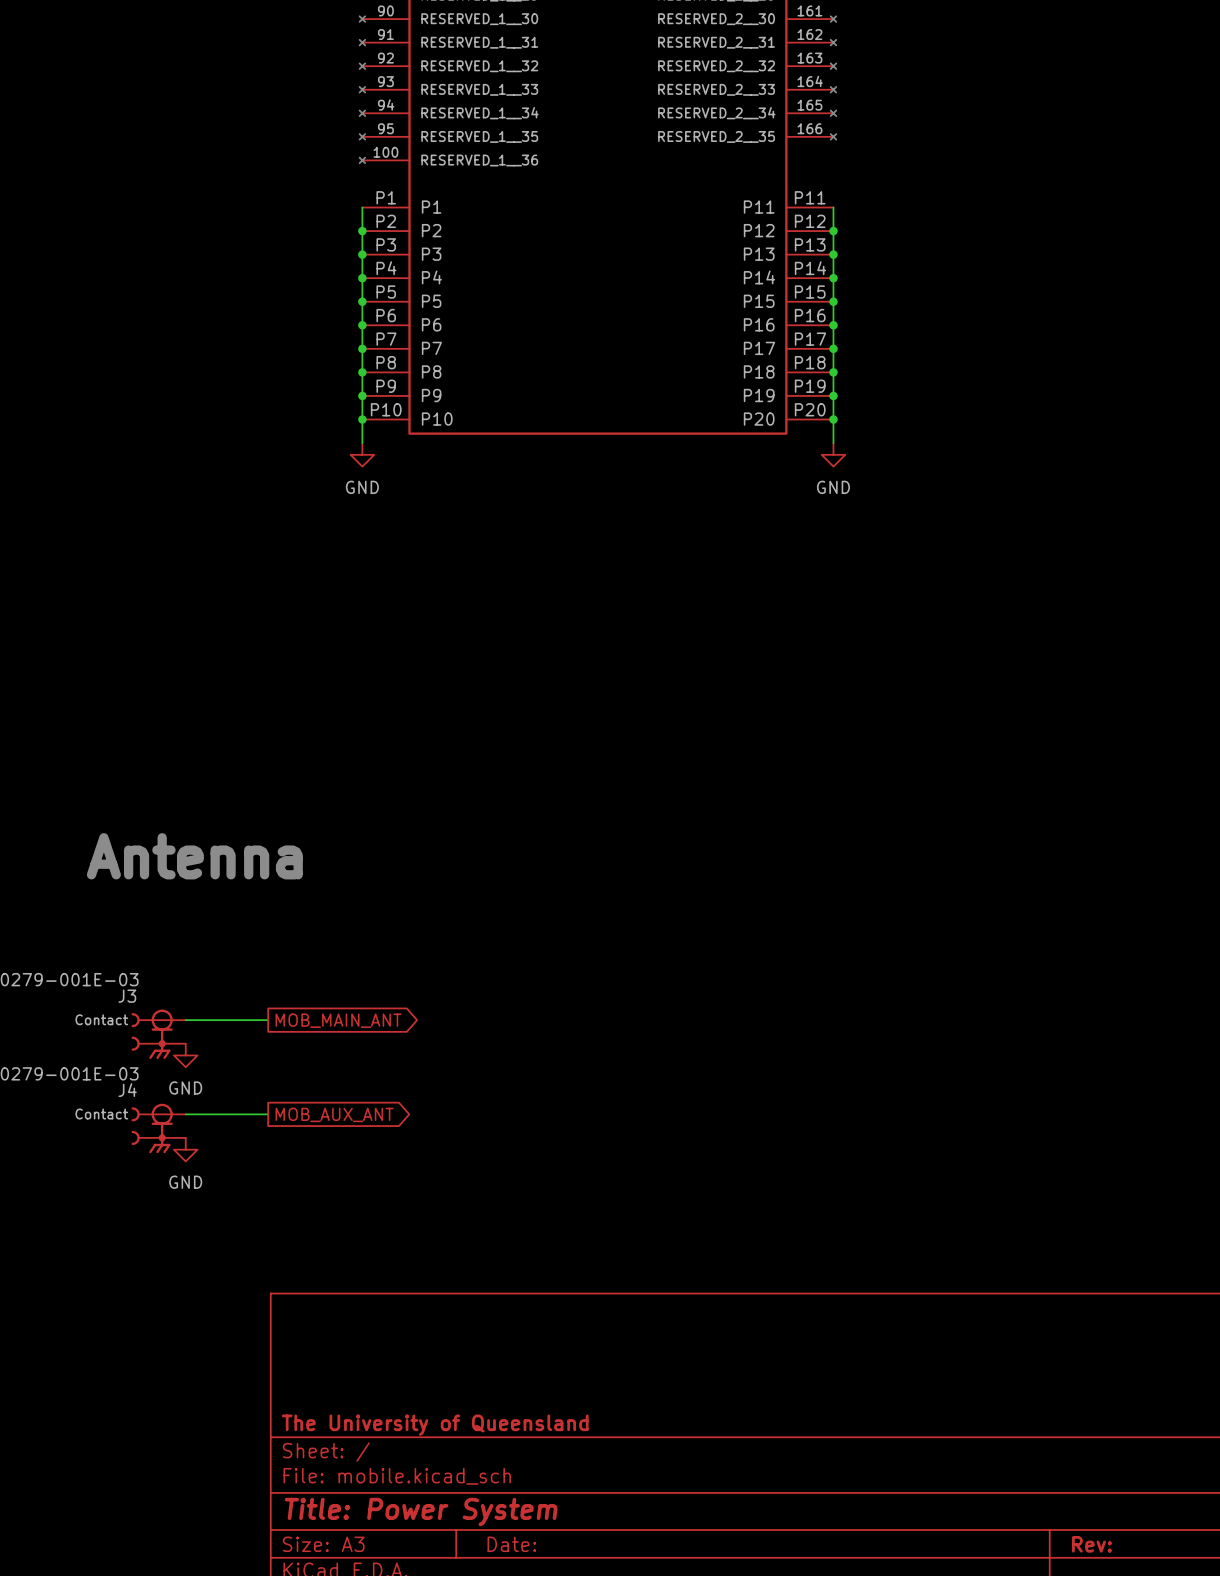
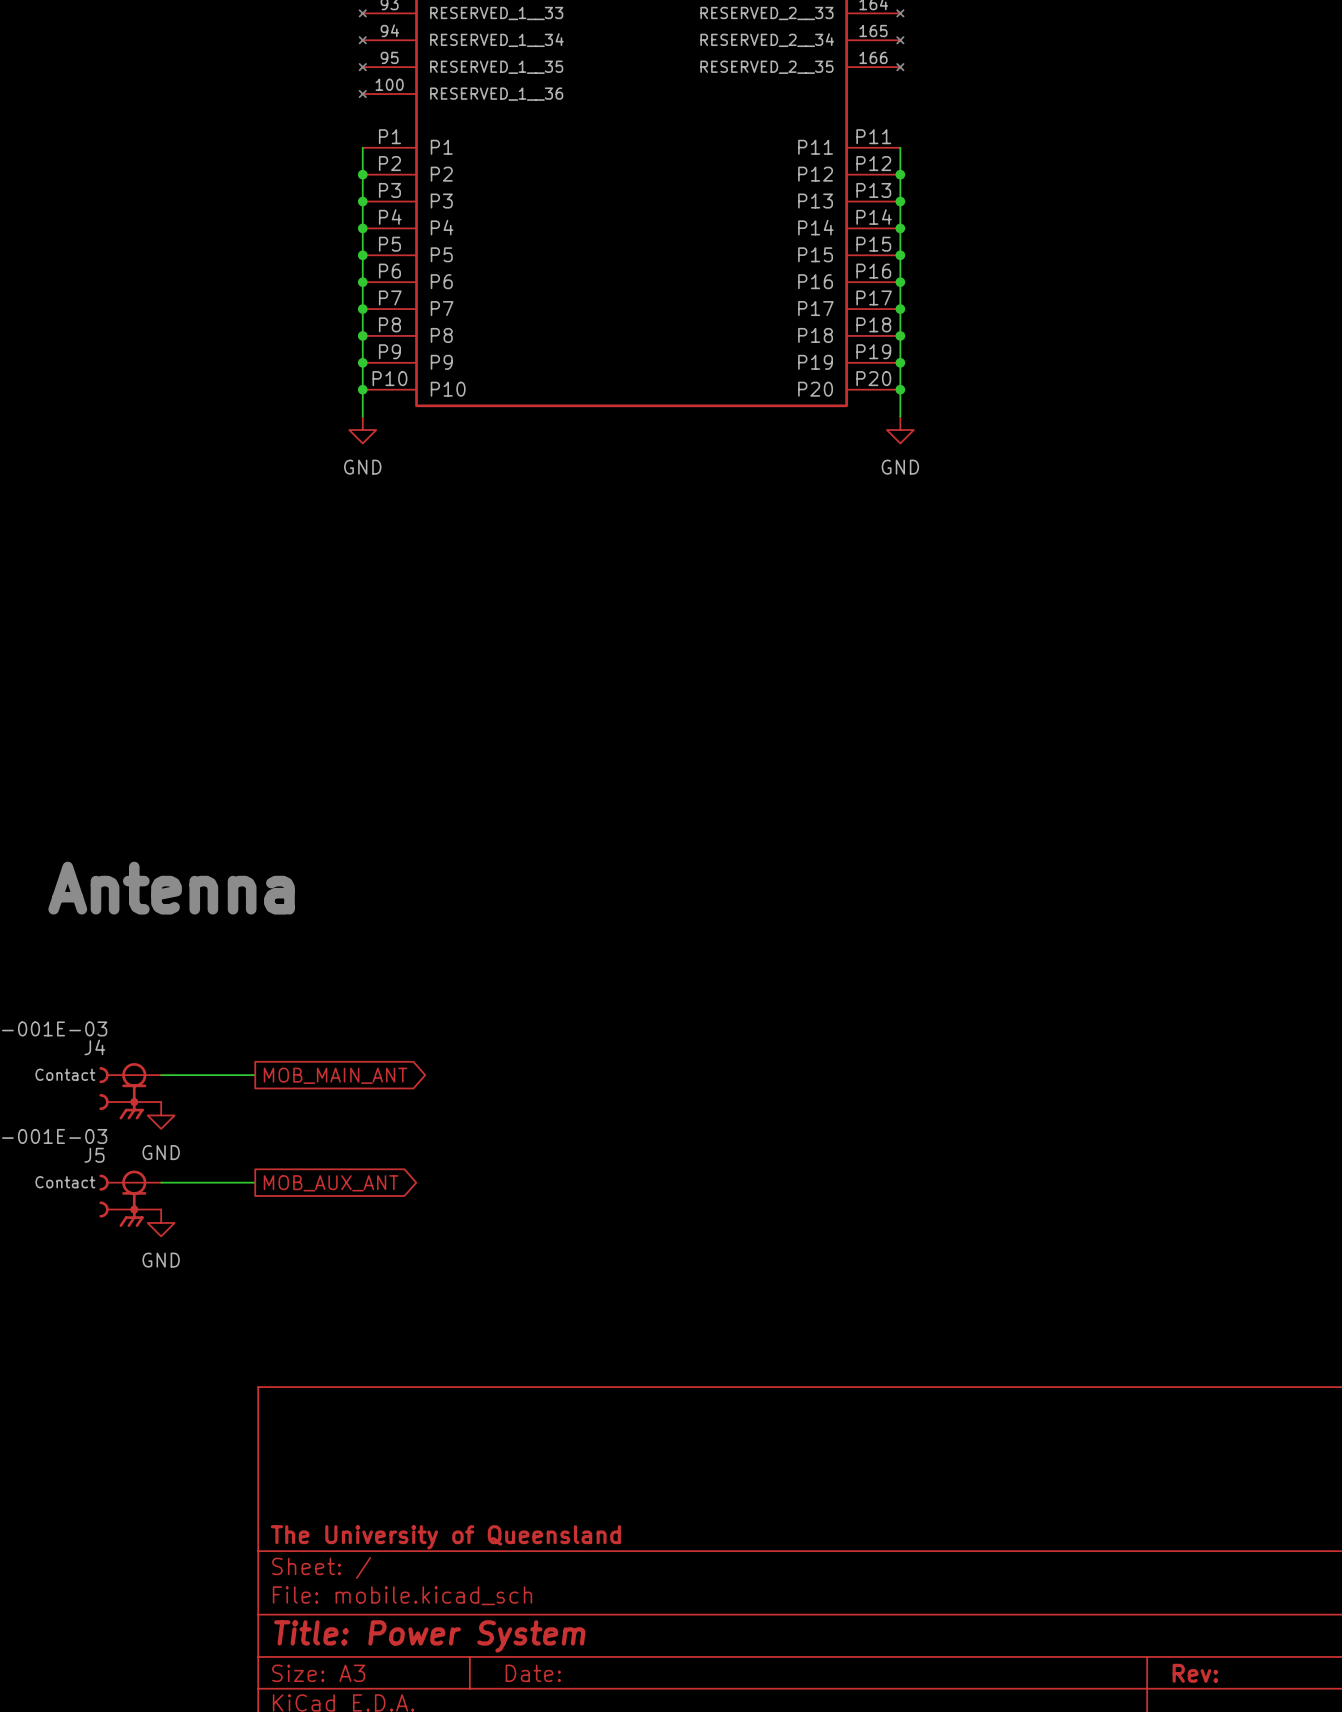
J3 name: J3 (127, 996) -> J4 (94, 1047)
J4 name: J4 (127, 1090) -> J5 (94, 1155)

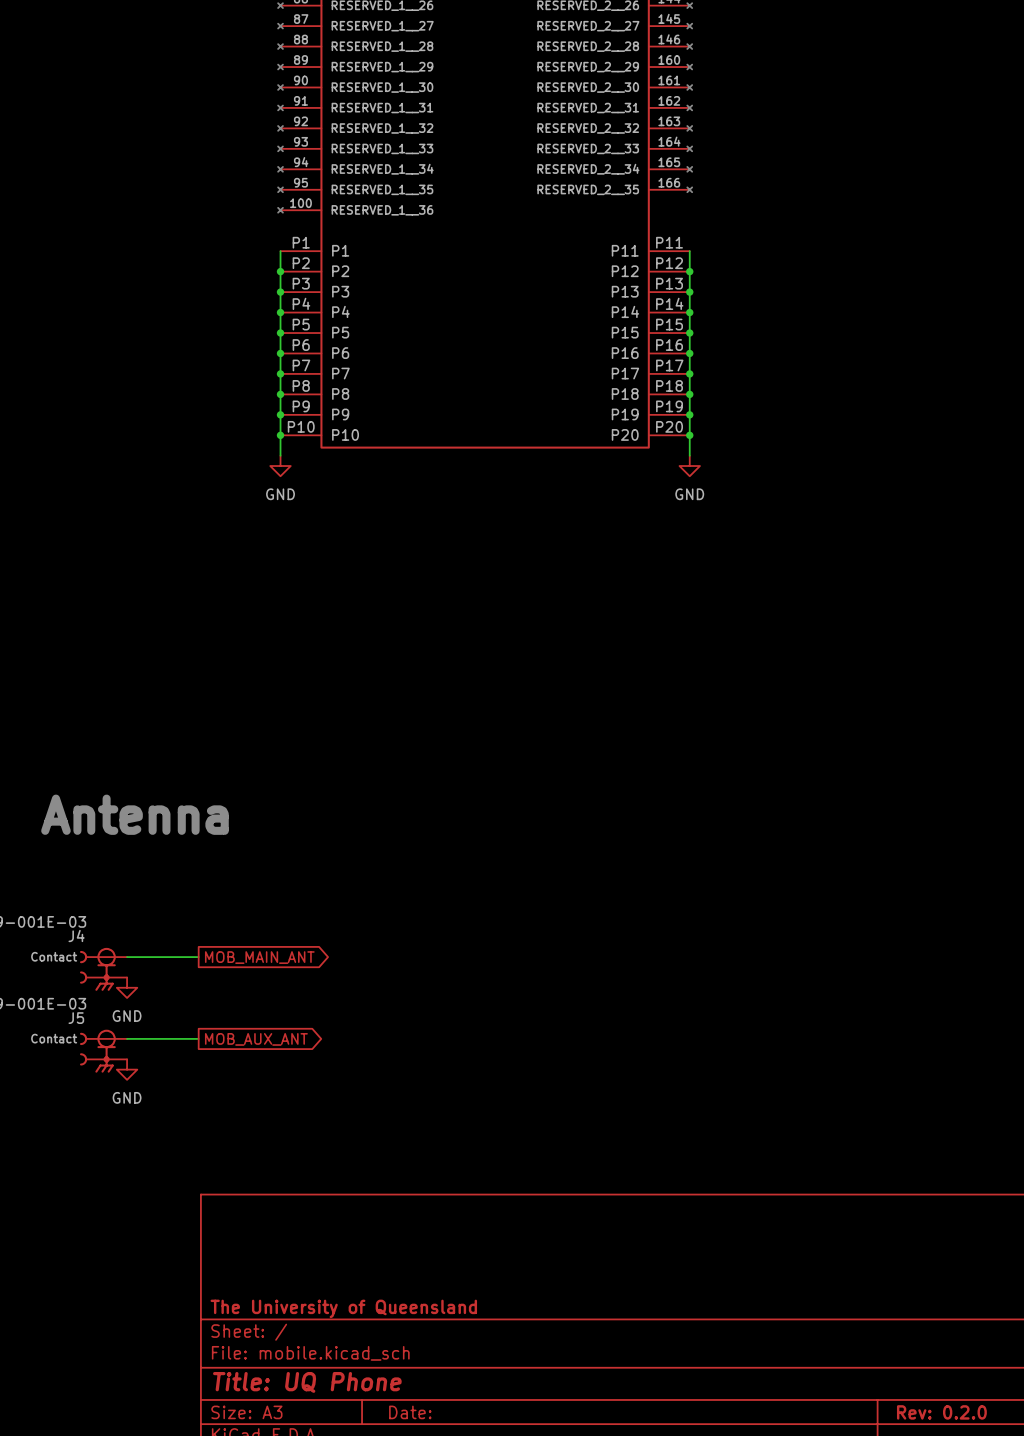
title block: Title: Power System (429, 1636) -> Title: UQ Phone (307, 1382)
title block: Rev: (1195, 1673) -> Rev: 0.2.0 (941, 1412)

